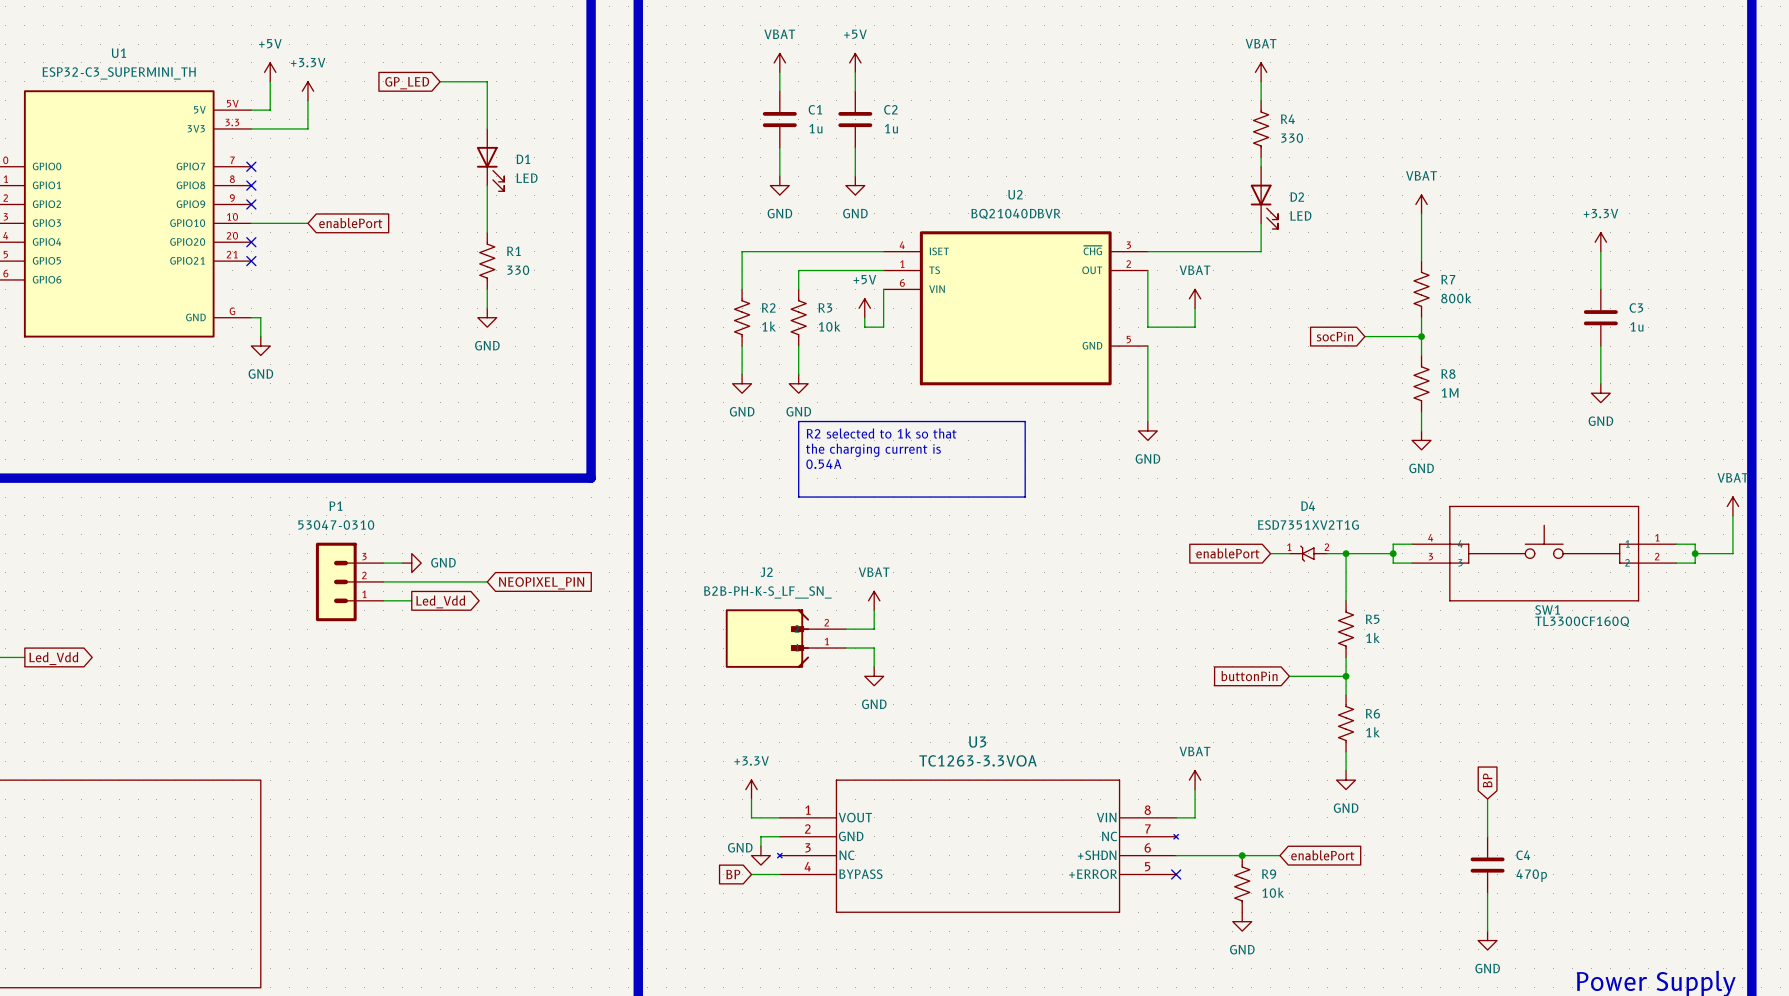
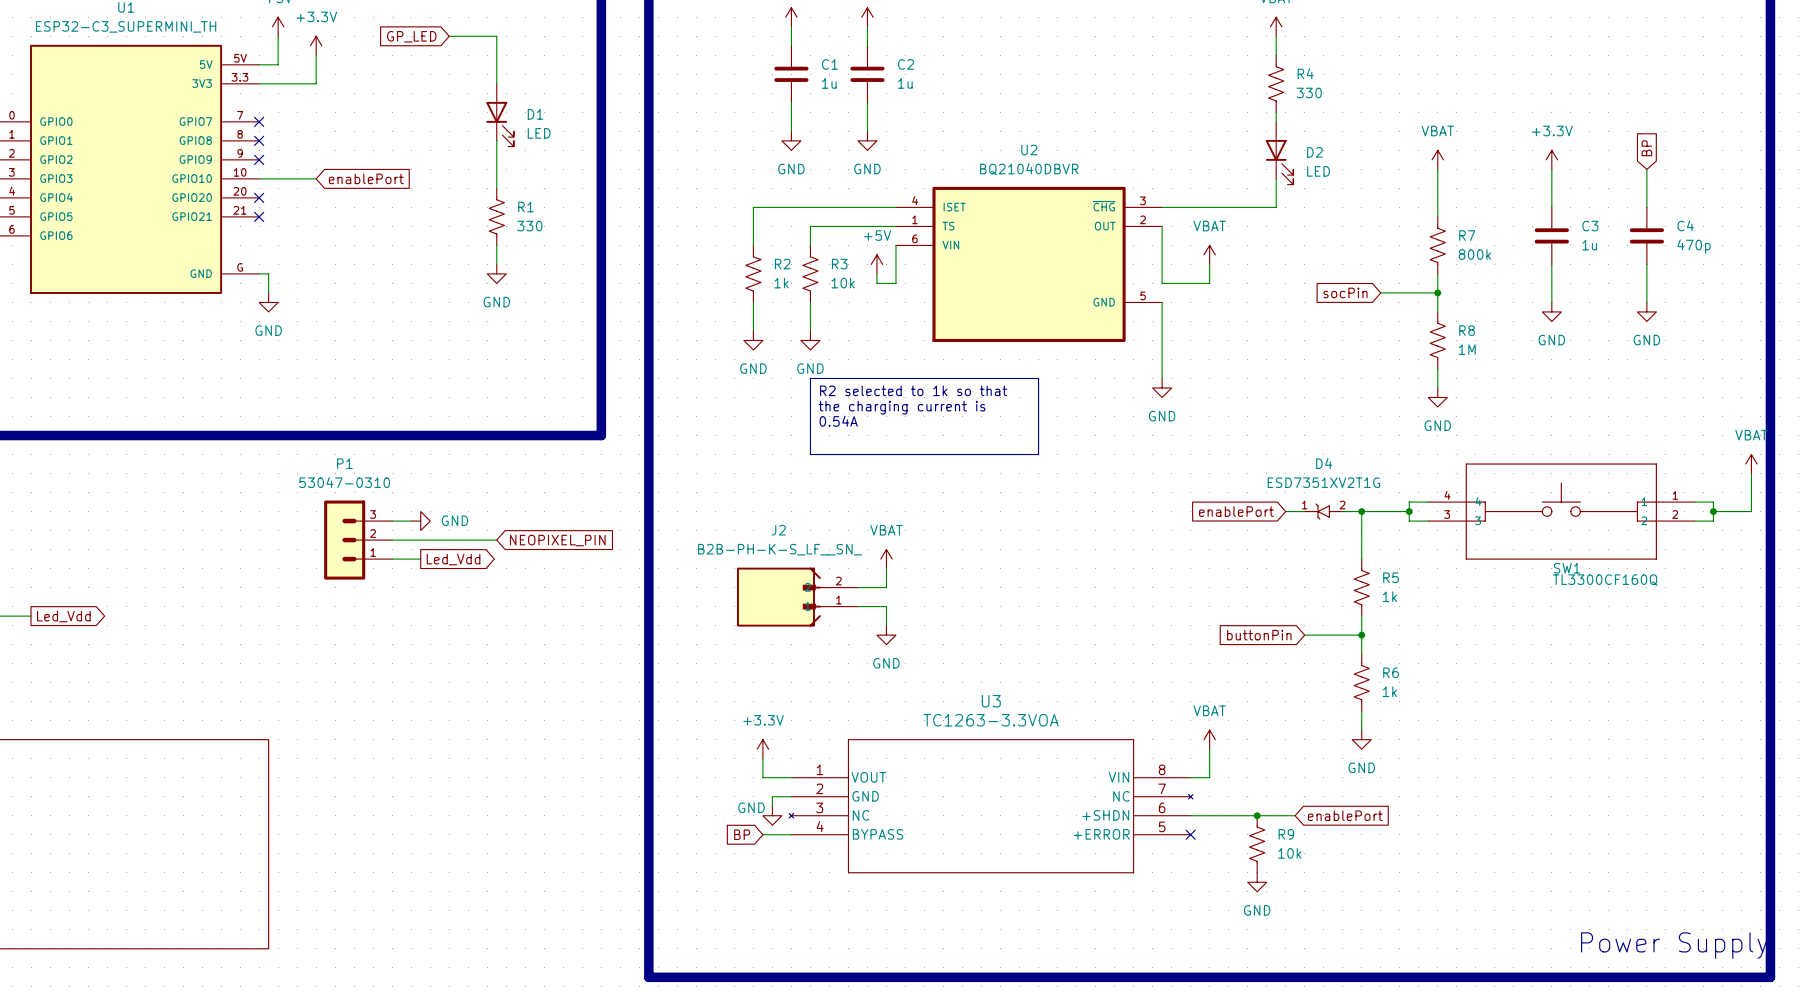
global label: none -> BP (1646, 148)
wire: none -> (1551, 169) (1551, 207)
power symbol position: +3.3V (1600, 242) -> +3.3V (1551, 159)
wire: (1600, 251) (1600, 289) -> (1646, 169) (1646, 207)
wire: none -> (1551, 264) (1551, 302)
C3 position: (1600, 317) -> (1551, 235)
wire: (1600, 346) (1600, 383) -> (1646, 264) (1646, 302)
power symbol: none -> GND (1551, 311)
power symbol: none -> GND (1646, 311)
power symbol: GND (1600, 393) -> none
global label: BP (1487, 780) -> none
wire: (1487, 799) (1487, 836) -> none
C4 position: (1487, 865) -> (1646, 235)
wire: (1487, 893) (1487, 931) -> none
power symbol: GND (1487, 940) -> none

